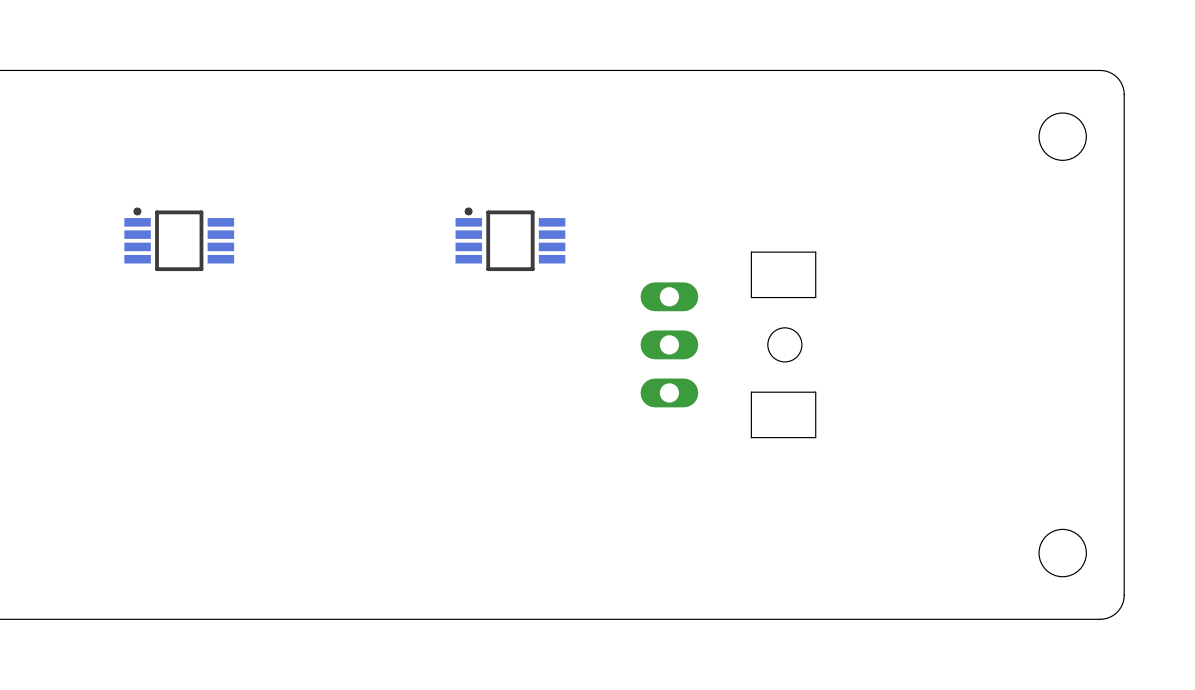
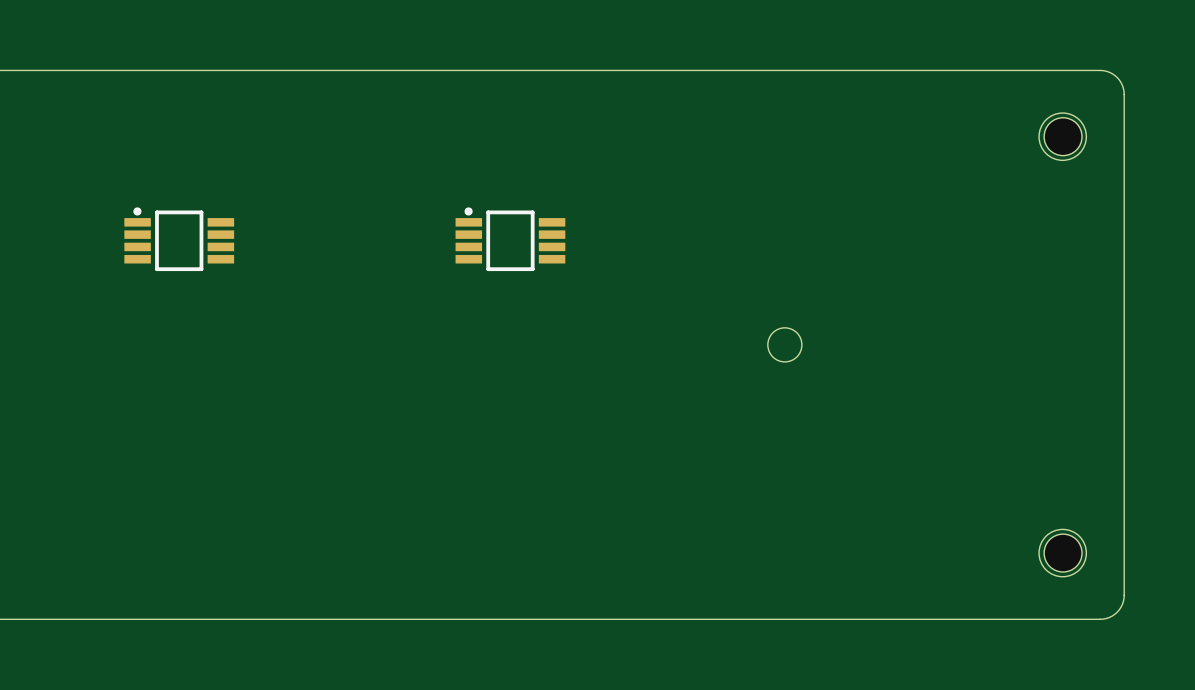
hole: none -> (1063, 136)
board edge: (815, 252) (815, 297) (751, 297) (751, 252) (815, 252) -> none
part: (669, 344) -> none
board edge: (815, 392) (815, 437) (751, 437) (751, 392) (815, 392) -> none
hole: none -> (1063, 553)

